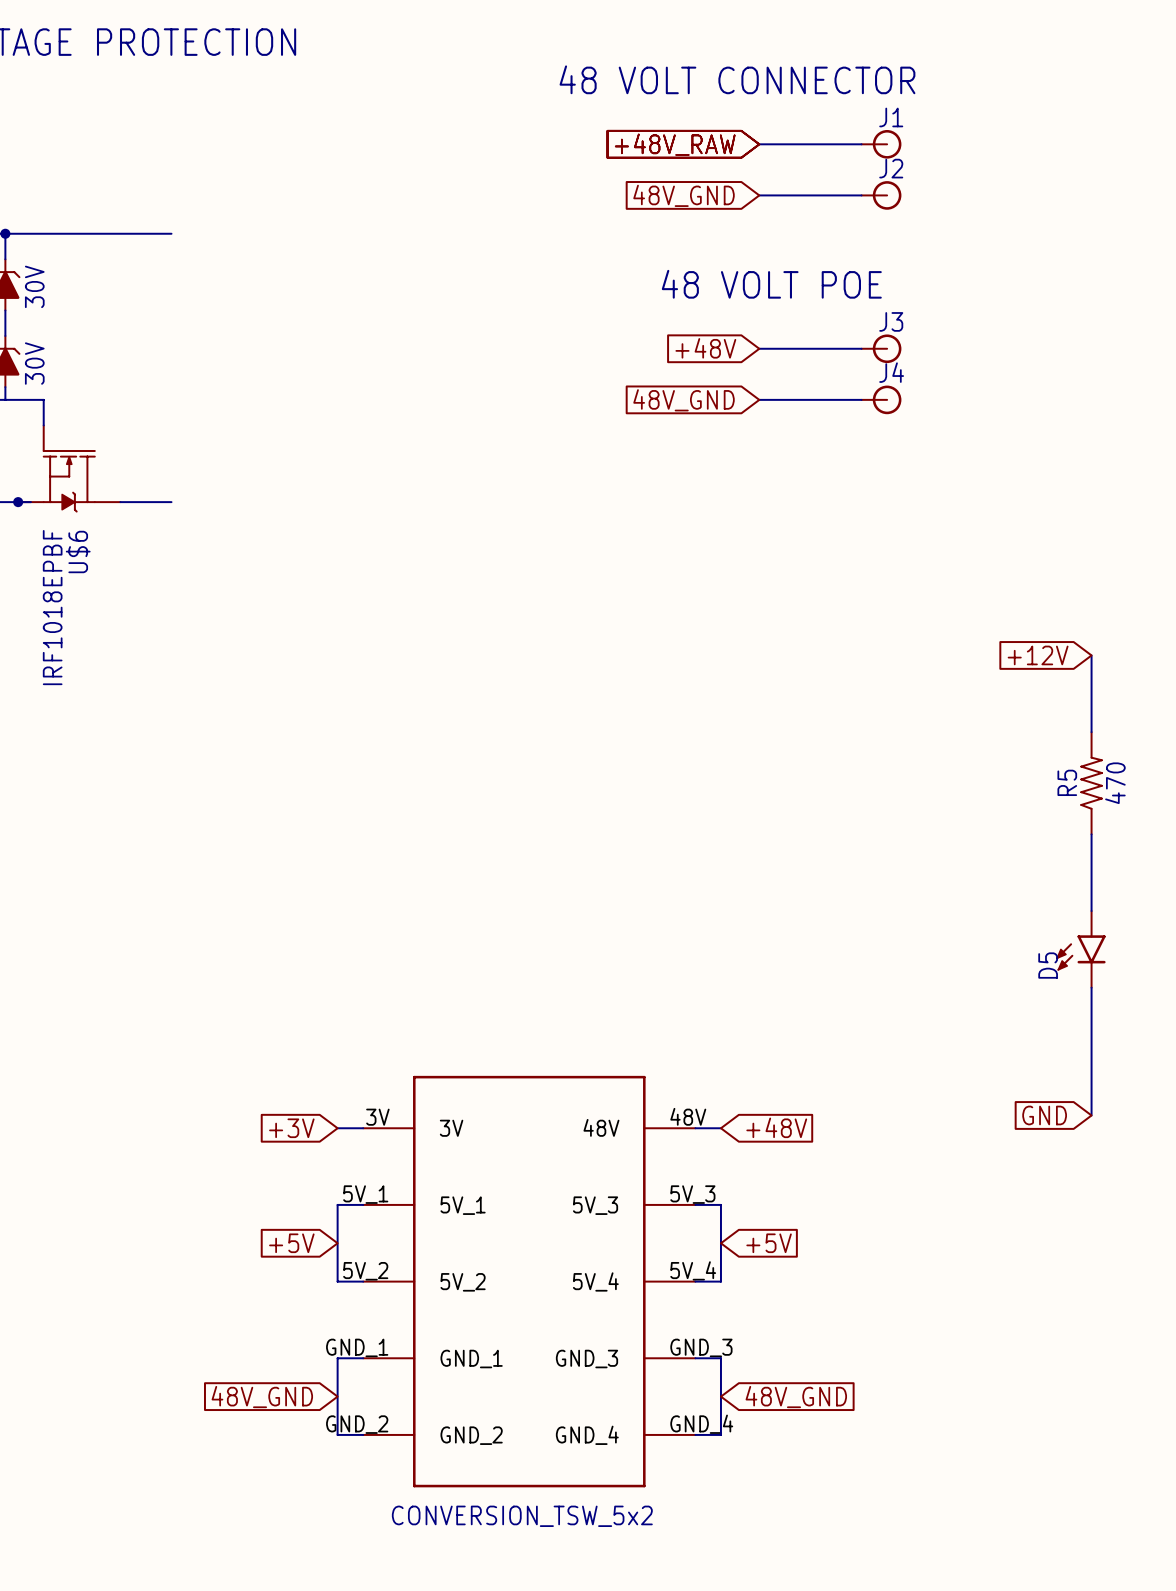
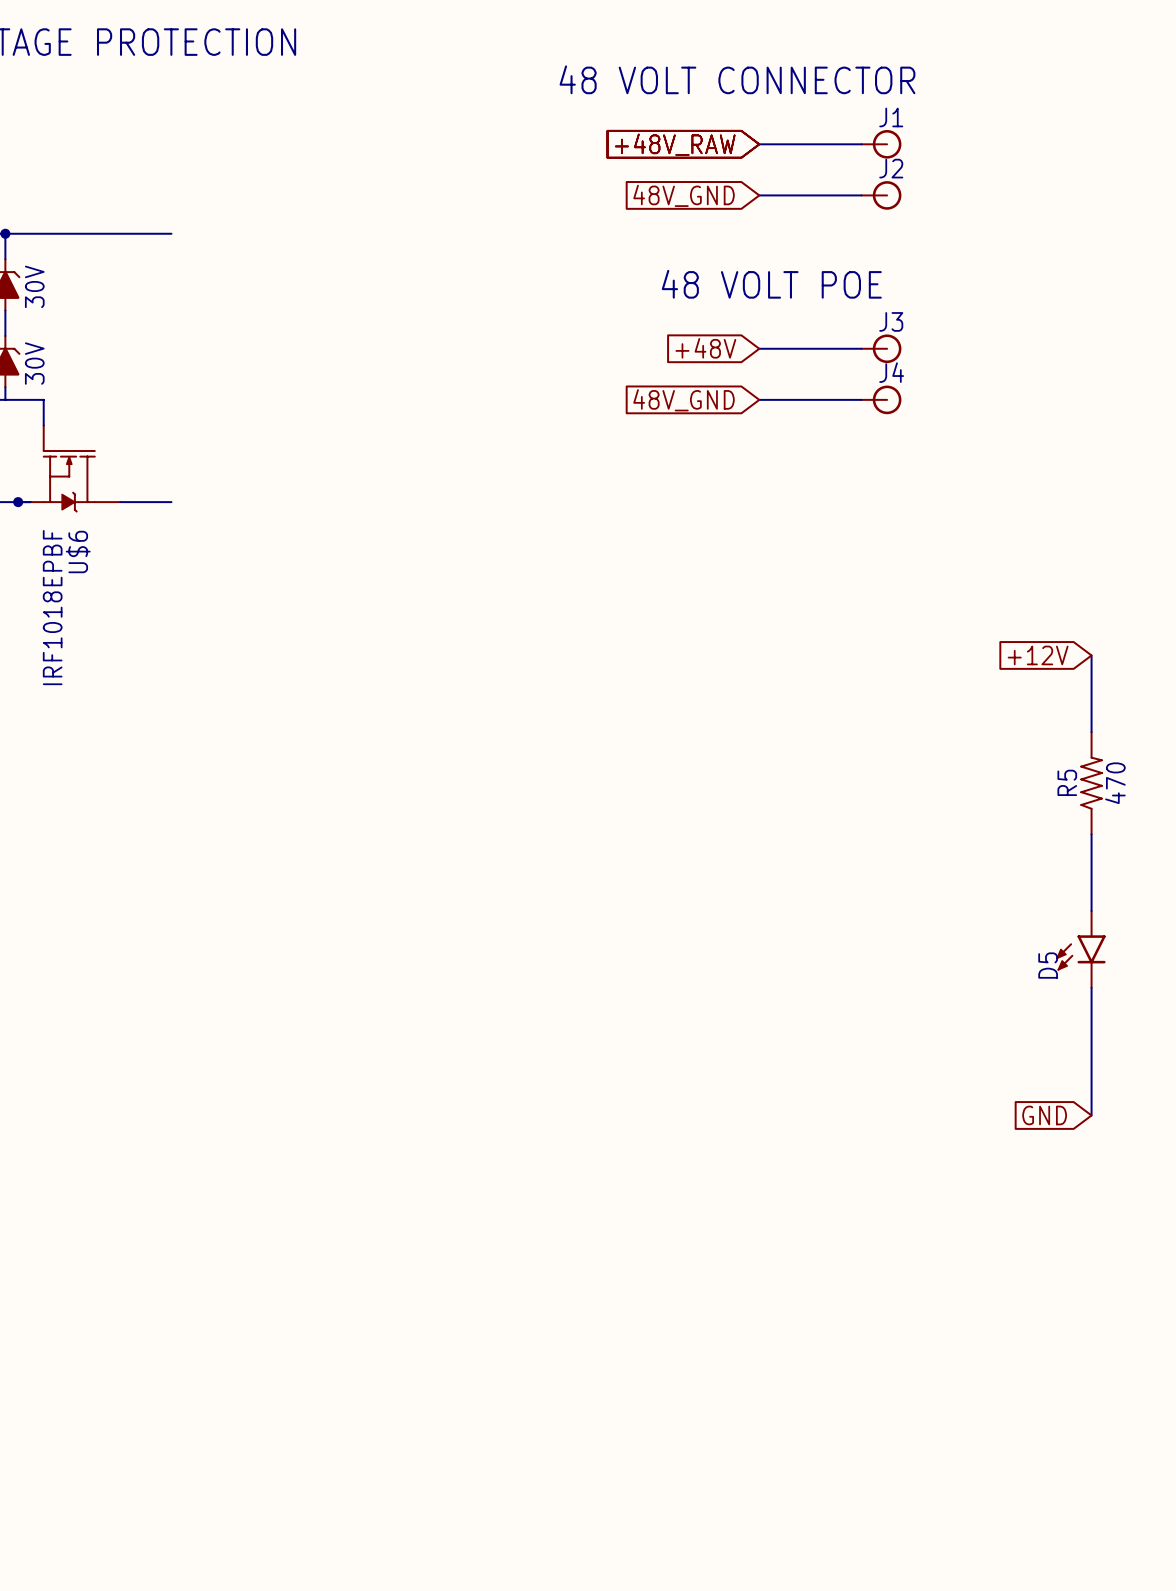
global label: +48V (776, 1127) -> none
global label: +3V (291, 1128) -> none
wire: (337, 1128) (363, 1128) -> none
wire: (695, 1128) (720, 1128) -> none
wire: (363, 1204) (337, 1204) (337, 1281) (363, 1281) -> none
wire: (695, 1204) (720, 1204) (720, 1281) (695, 1281) -> none
global label: +5V (291, 1243) -> none
global label: +5V (769, 1243) -> none
part: (529, 1281) -> none
wire: (363, 1358) (337, 1358) (337, 1434) (363, 1434) -> none
wire: (695, 1358) (720, 1358) (720, 1434) (695, 1434) -> none
global label: 48V_GND (262, 1397) -> none
global label: 48V_GND (796, 1397) -> none
text: CONVERSION_TSW_5x2 (522, 1516) -> none

